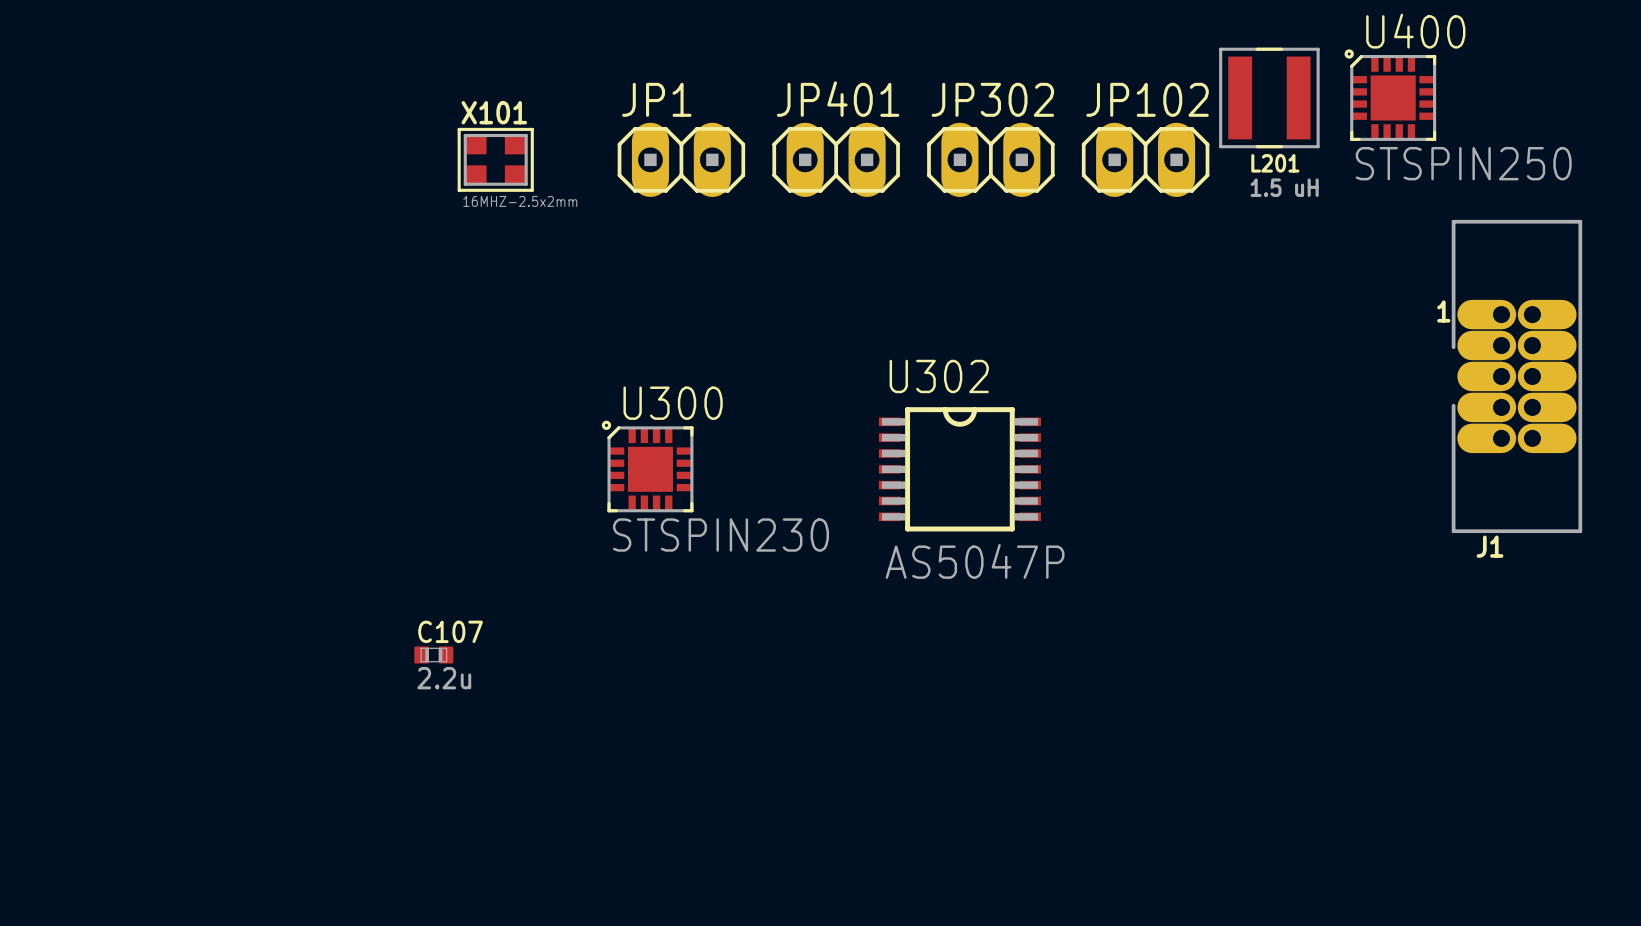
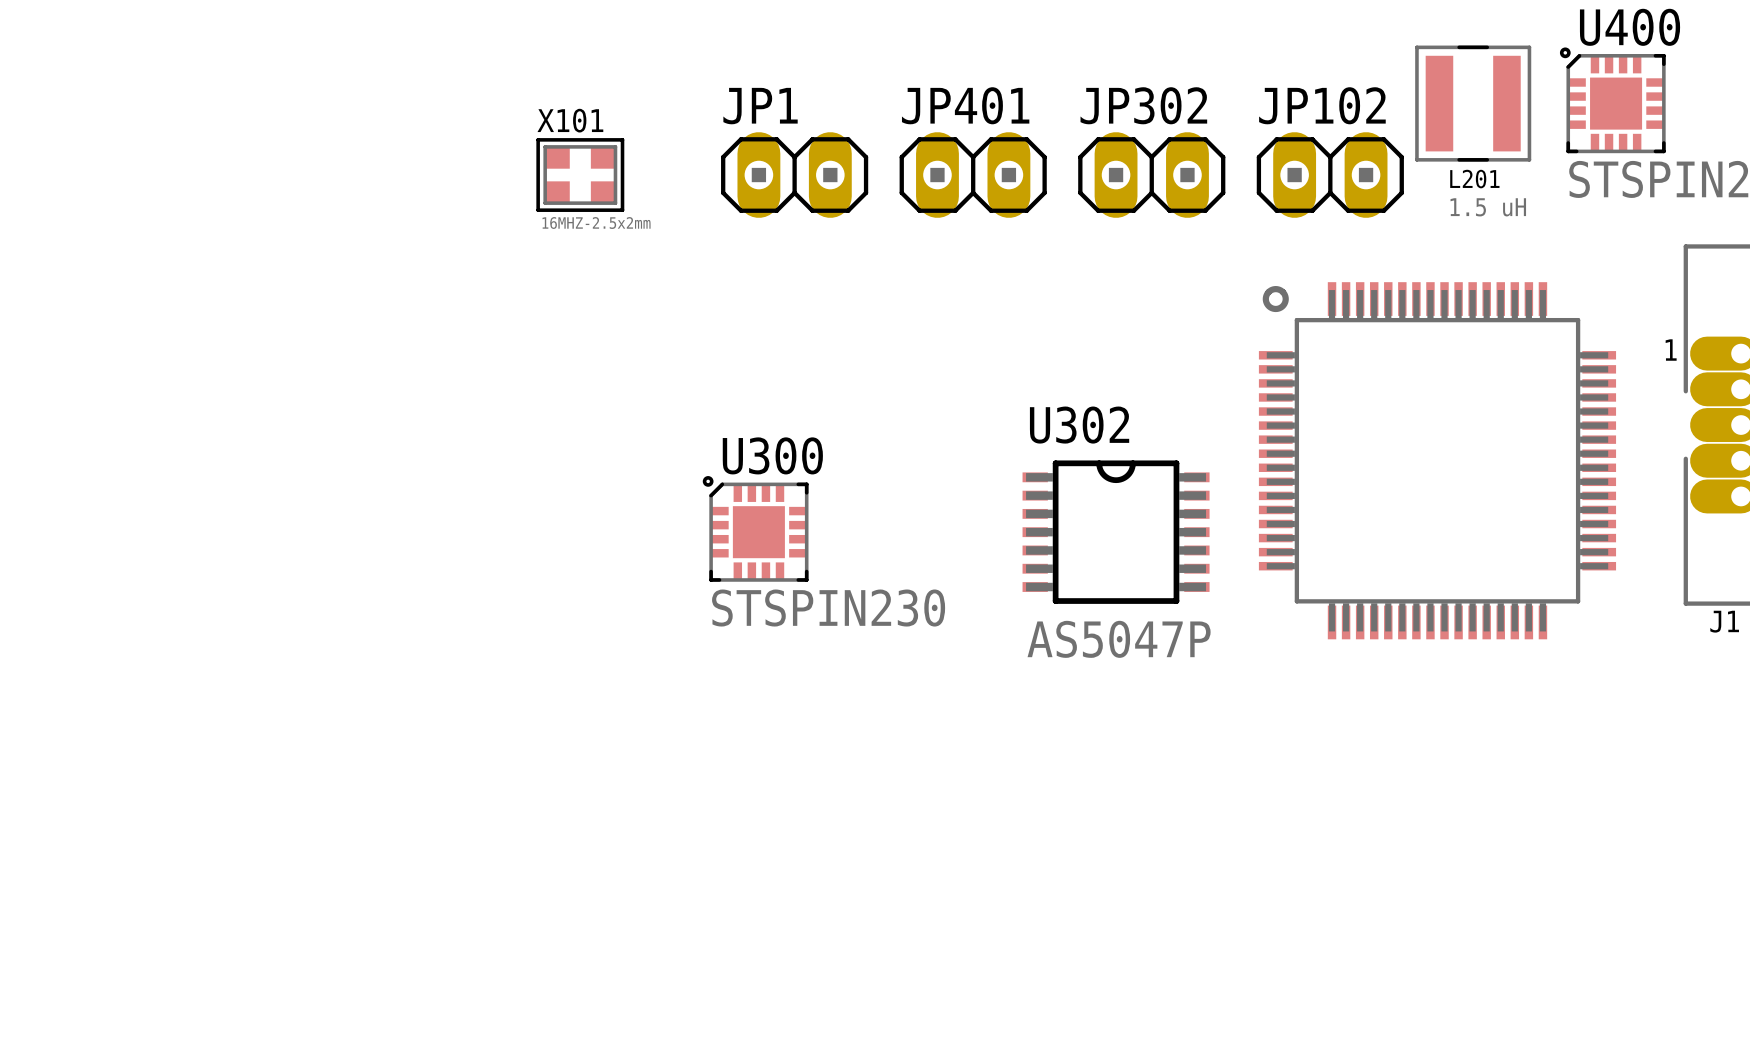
part: none -> (1437, 460)
C107: 2.2u (433, 654) -> none

